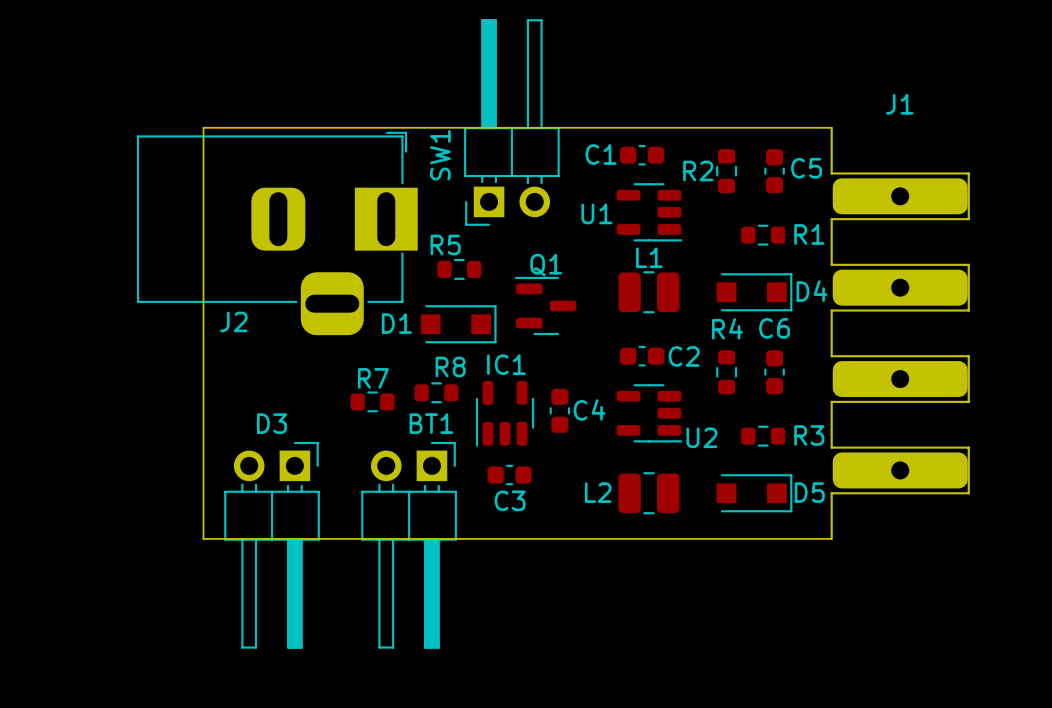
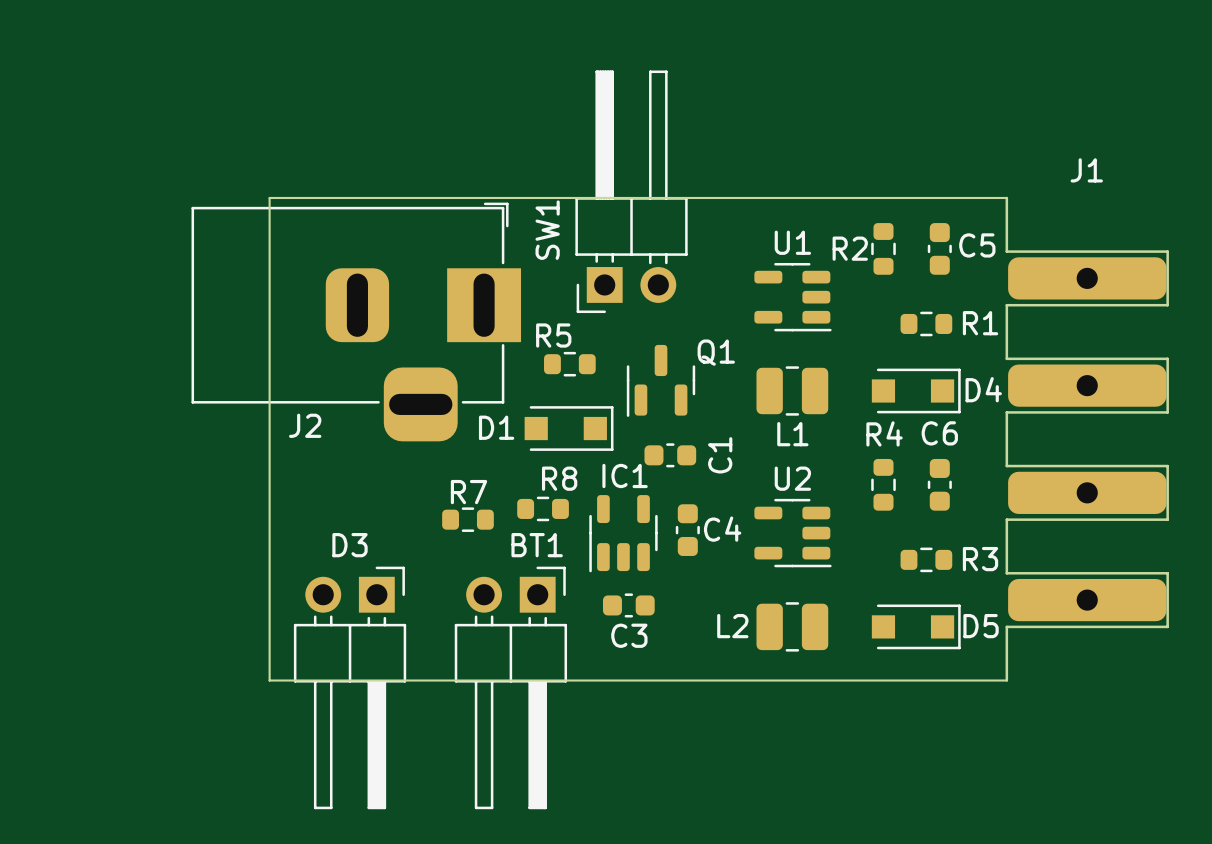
C1 name rotation: 0° (600, 154) -> 90° counterclockwise (720, 455)
C1 name position: C1 (600, 154) -> C1 (720, 455)
C1 position: (642, 155) -> (670, 455)
U1 name position: U1 (596, 213) -> U1 (792, 242)
L1 name position: L1 (649, 257) -> L1 (792, 434)
Q1 name position: Q1 (546, 265) -> Q1 (716, 352)
Q1 rotation: 0° (545, 305) -> 90° counterclockwise (661, 380)
C2: (642, 356) -> none
U2 name position: U2 (701, 437) -> U2 (792, 478)

